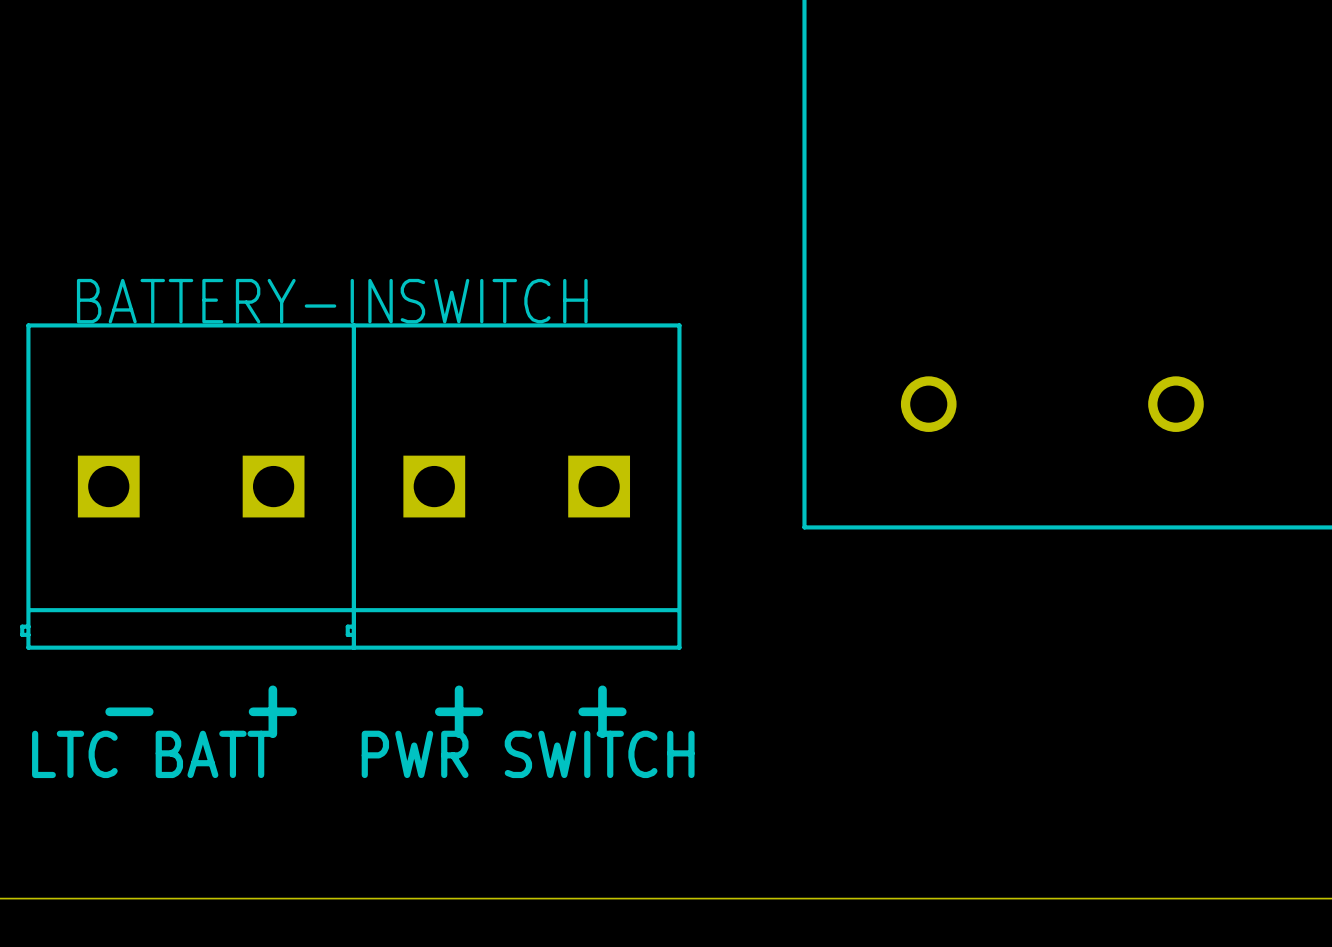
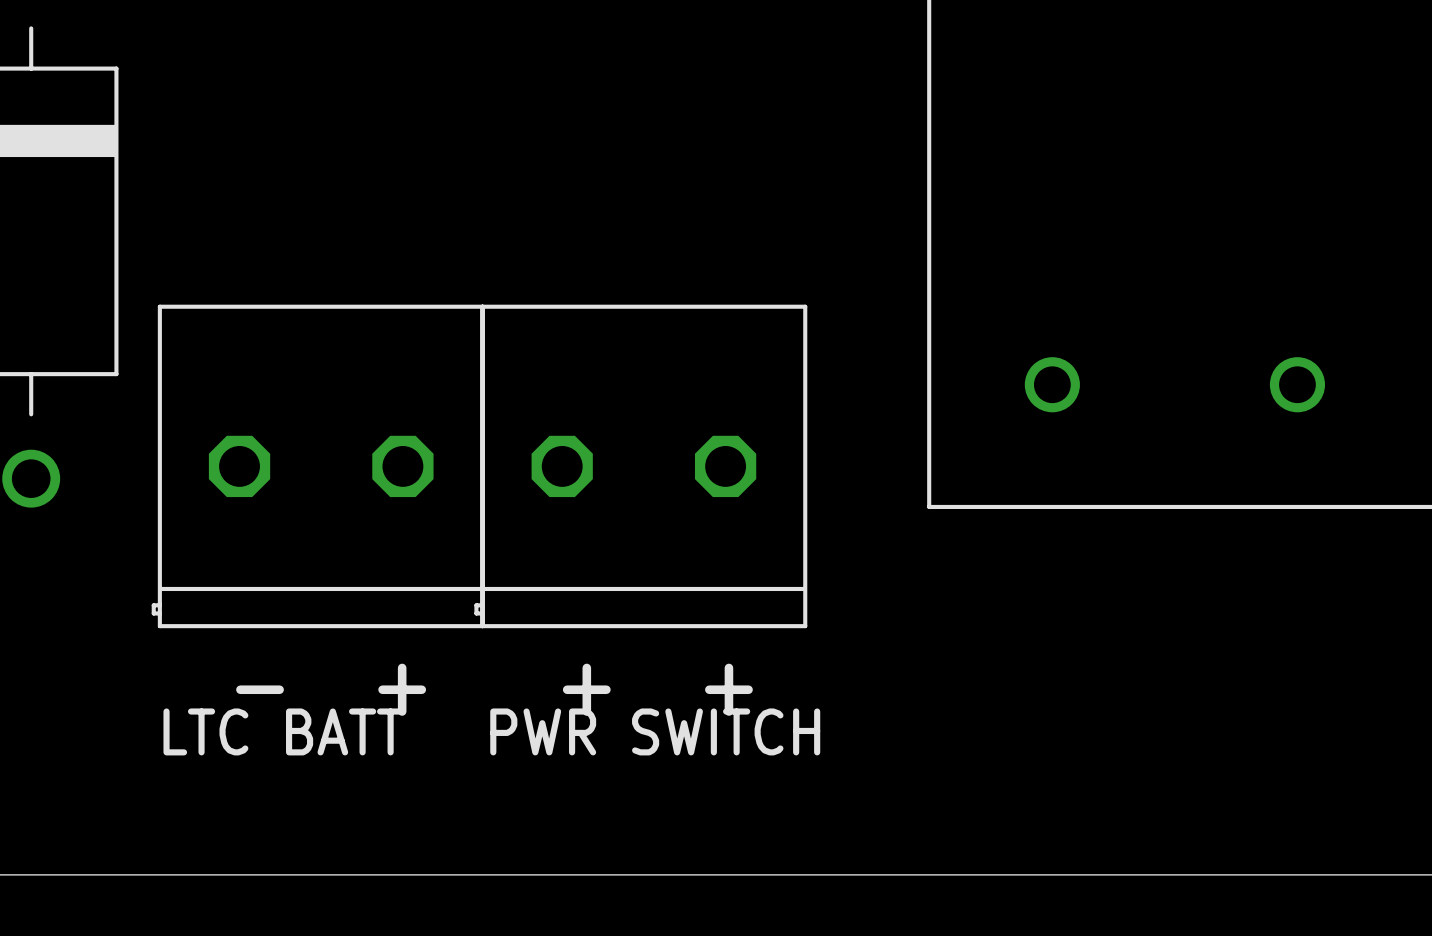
BATTERY-IN: (188, 486) -> none
part: none -> (318, 466)
SWITCH: (513, 486) -> none
part: none -> (640, 466)

